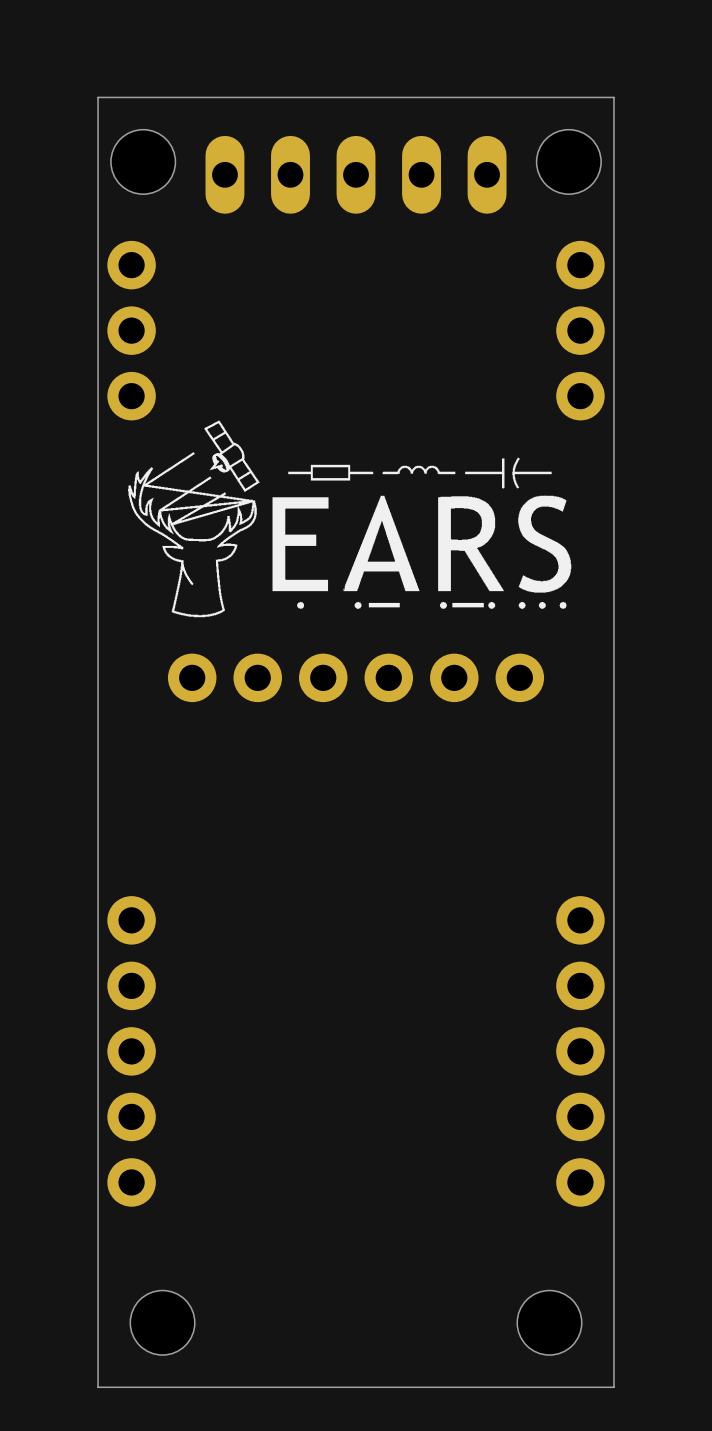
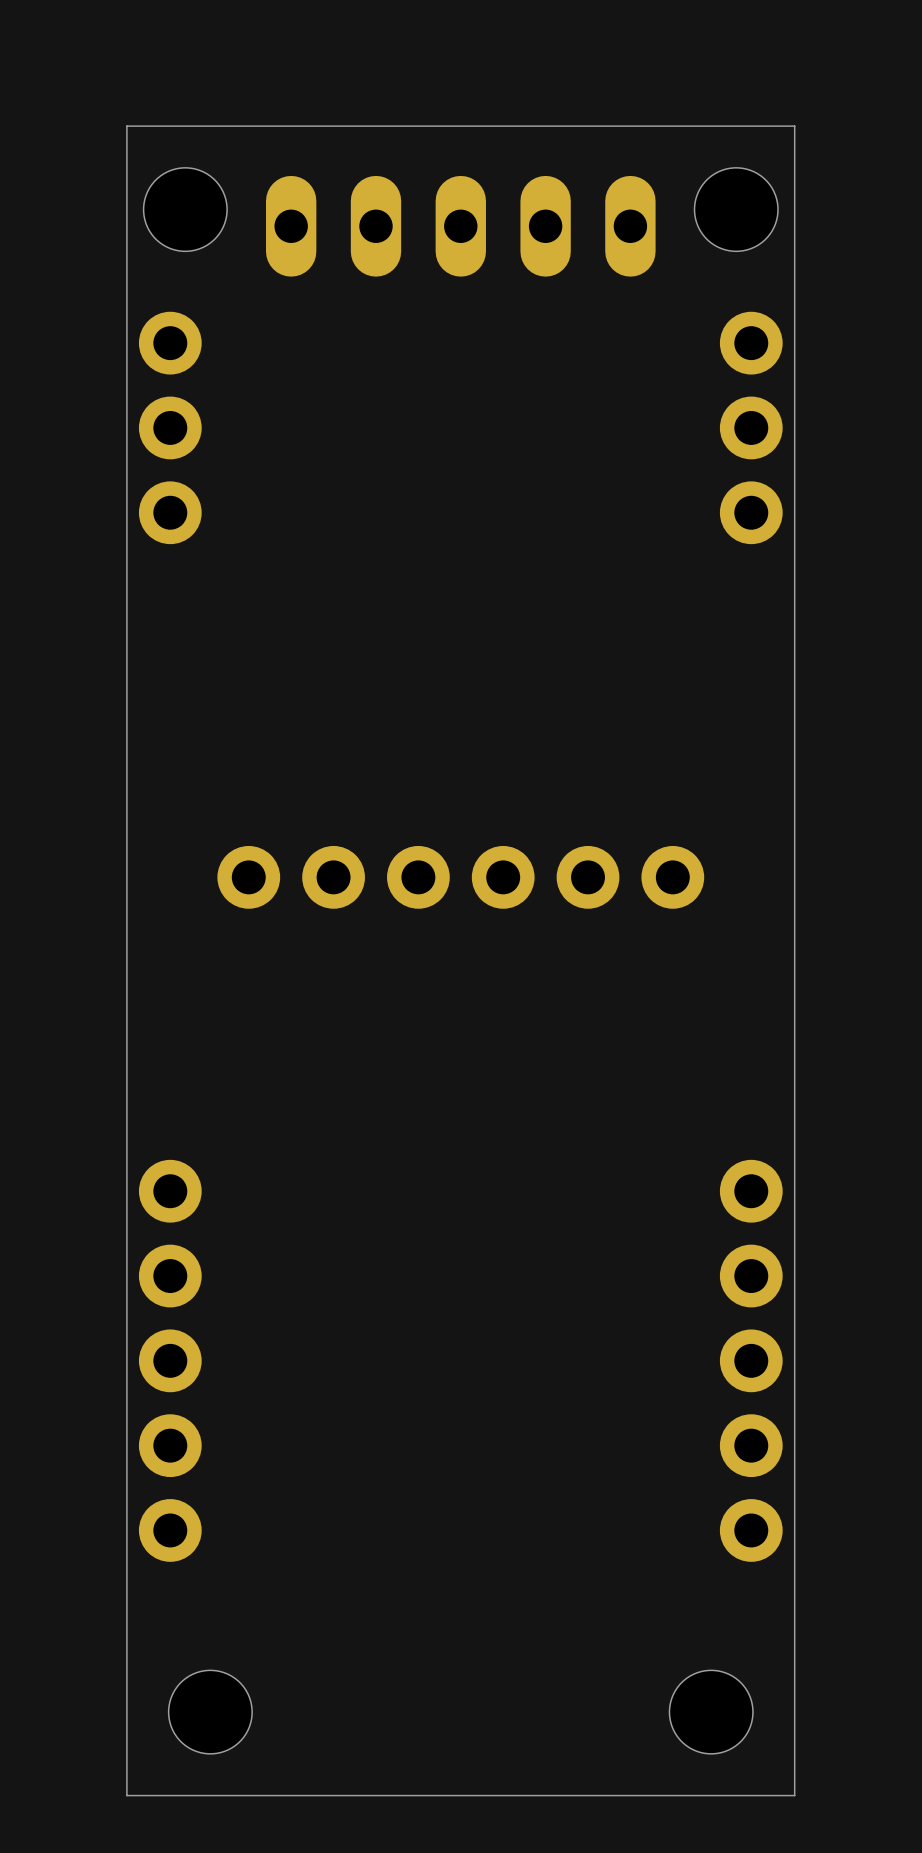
drawing: [128, 420, 572, 618] -> none

